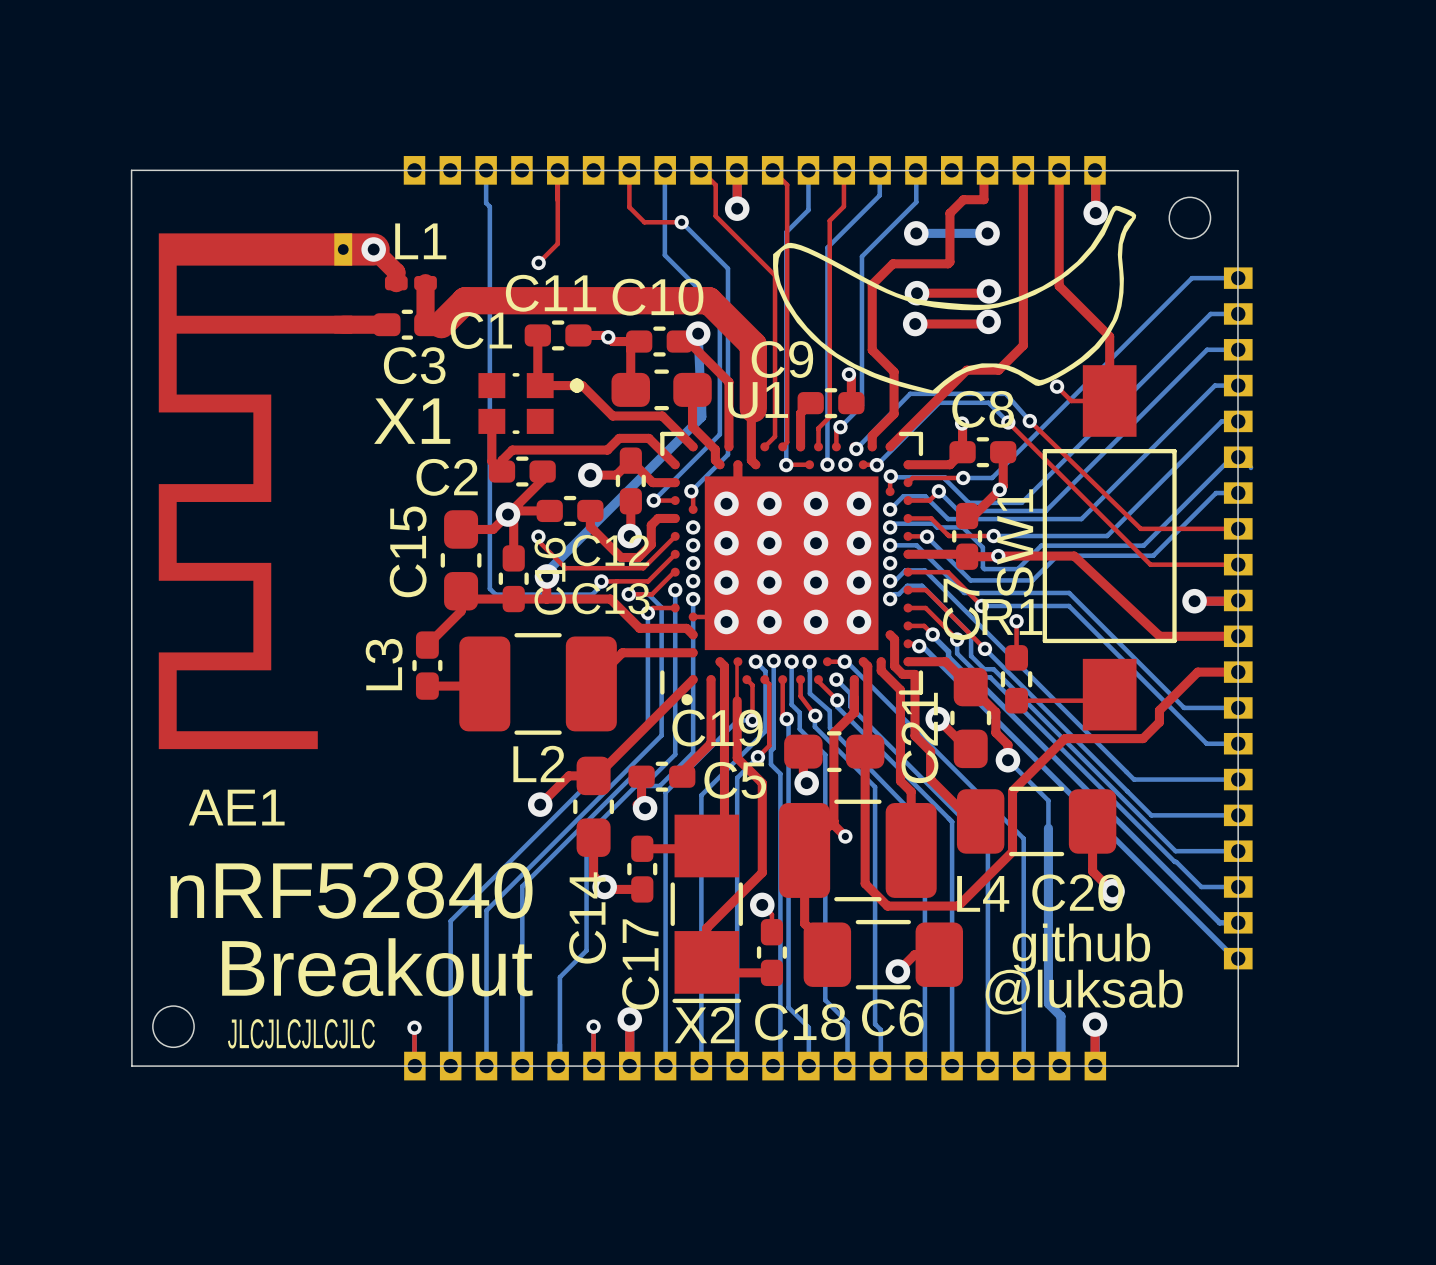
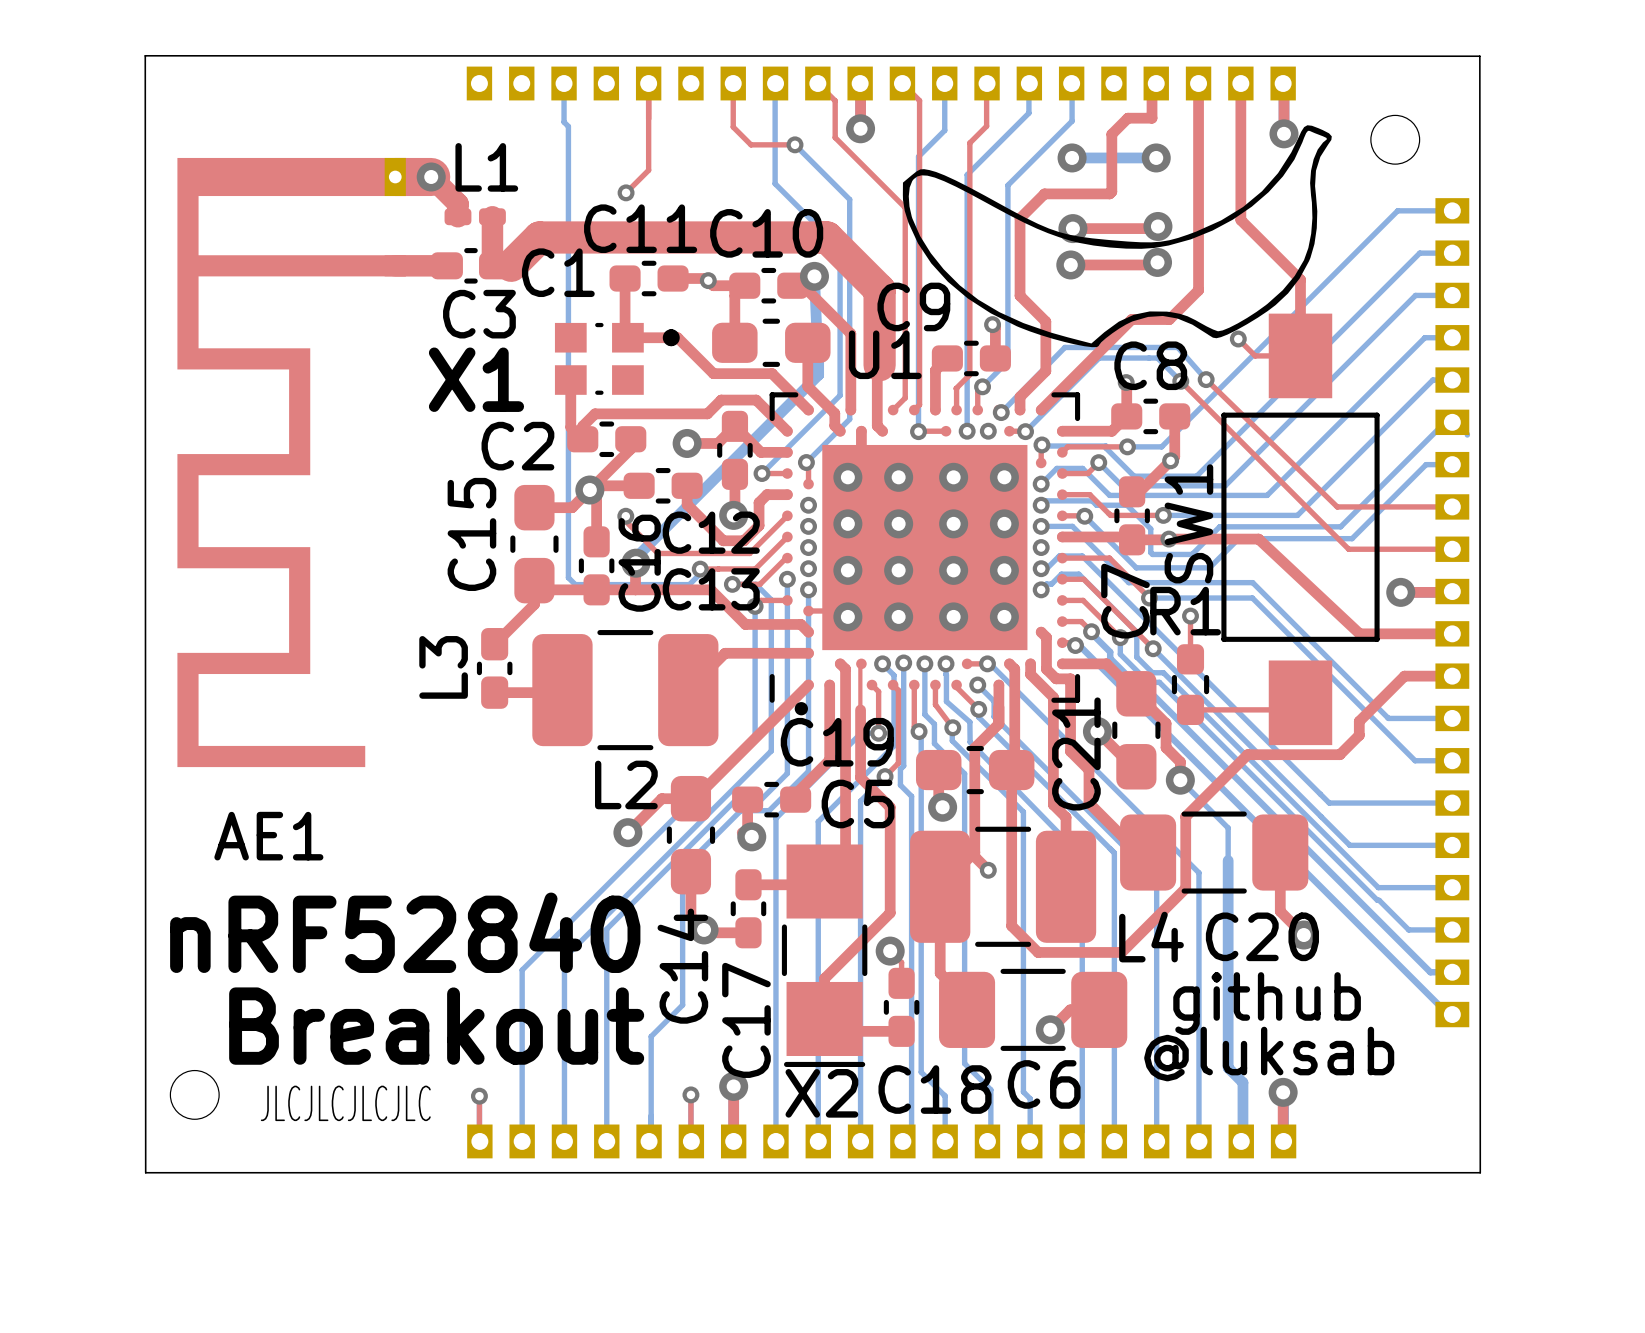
board edge: (131, 170) (1237, 170) (1238, 1066) (131, 1066) -> (145, 83) (145, 55) (1479, 56) (1480, 1172) (145, 1172) (145, 1141)

